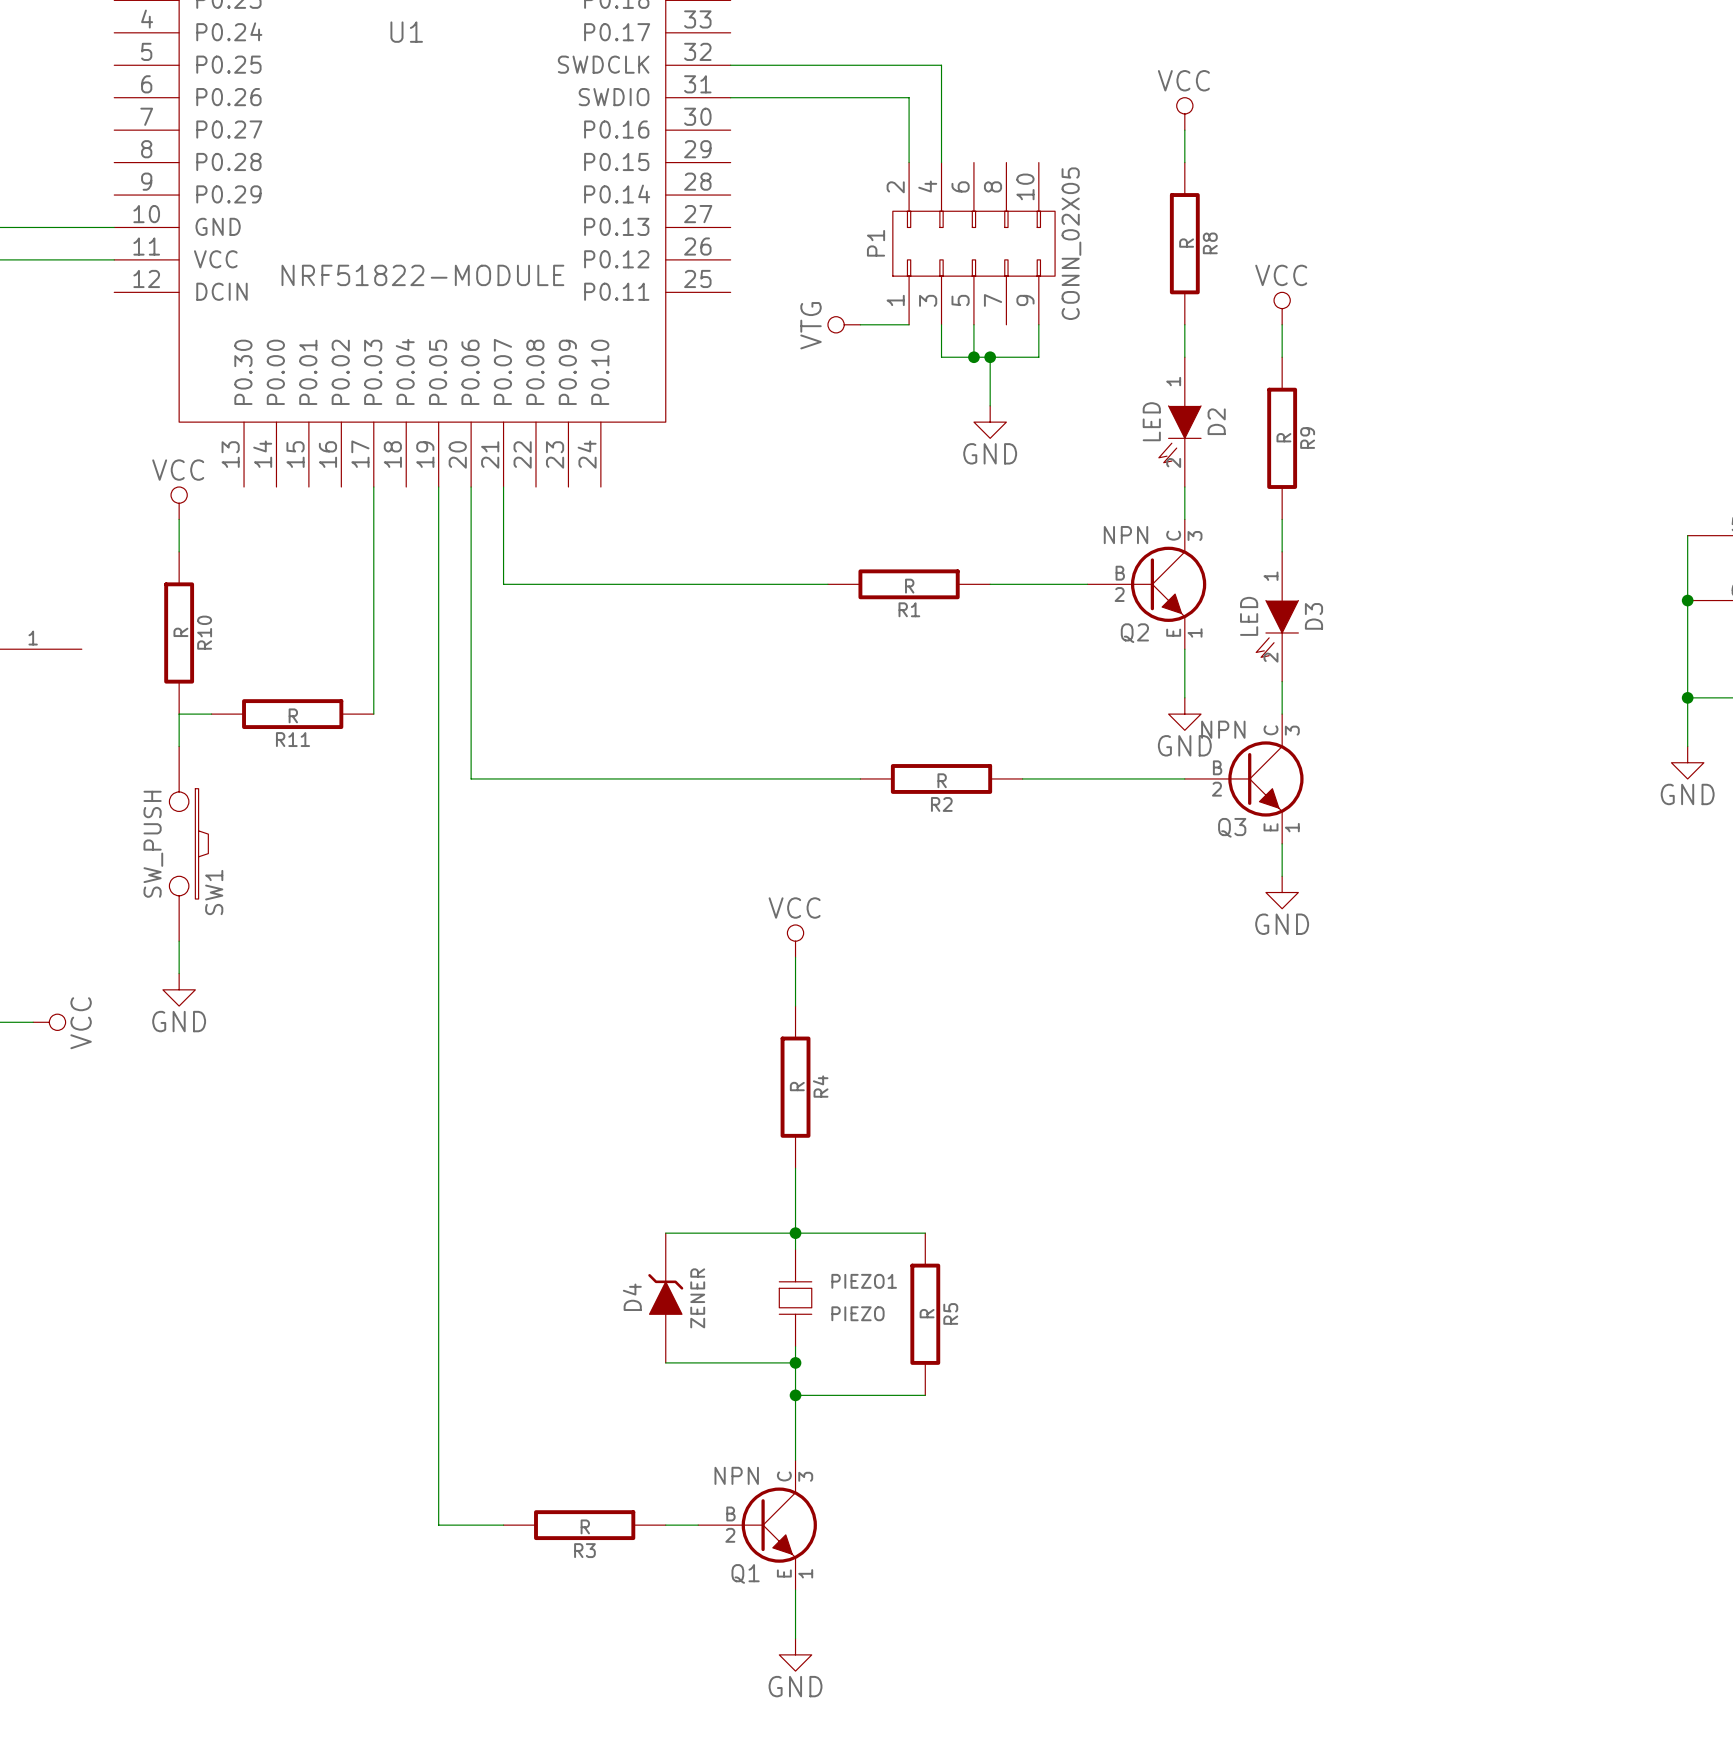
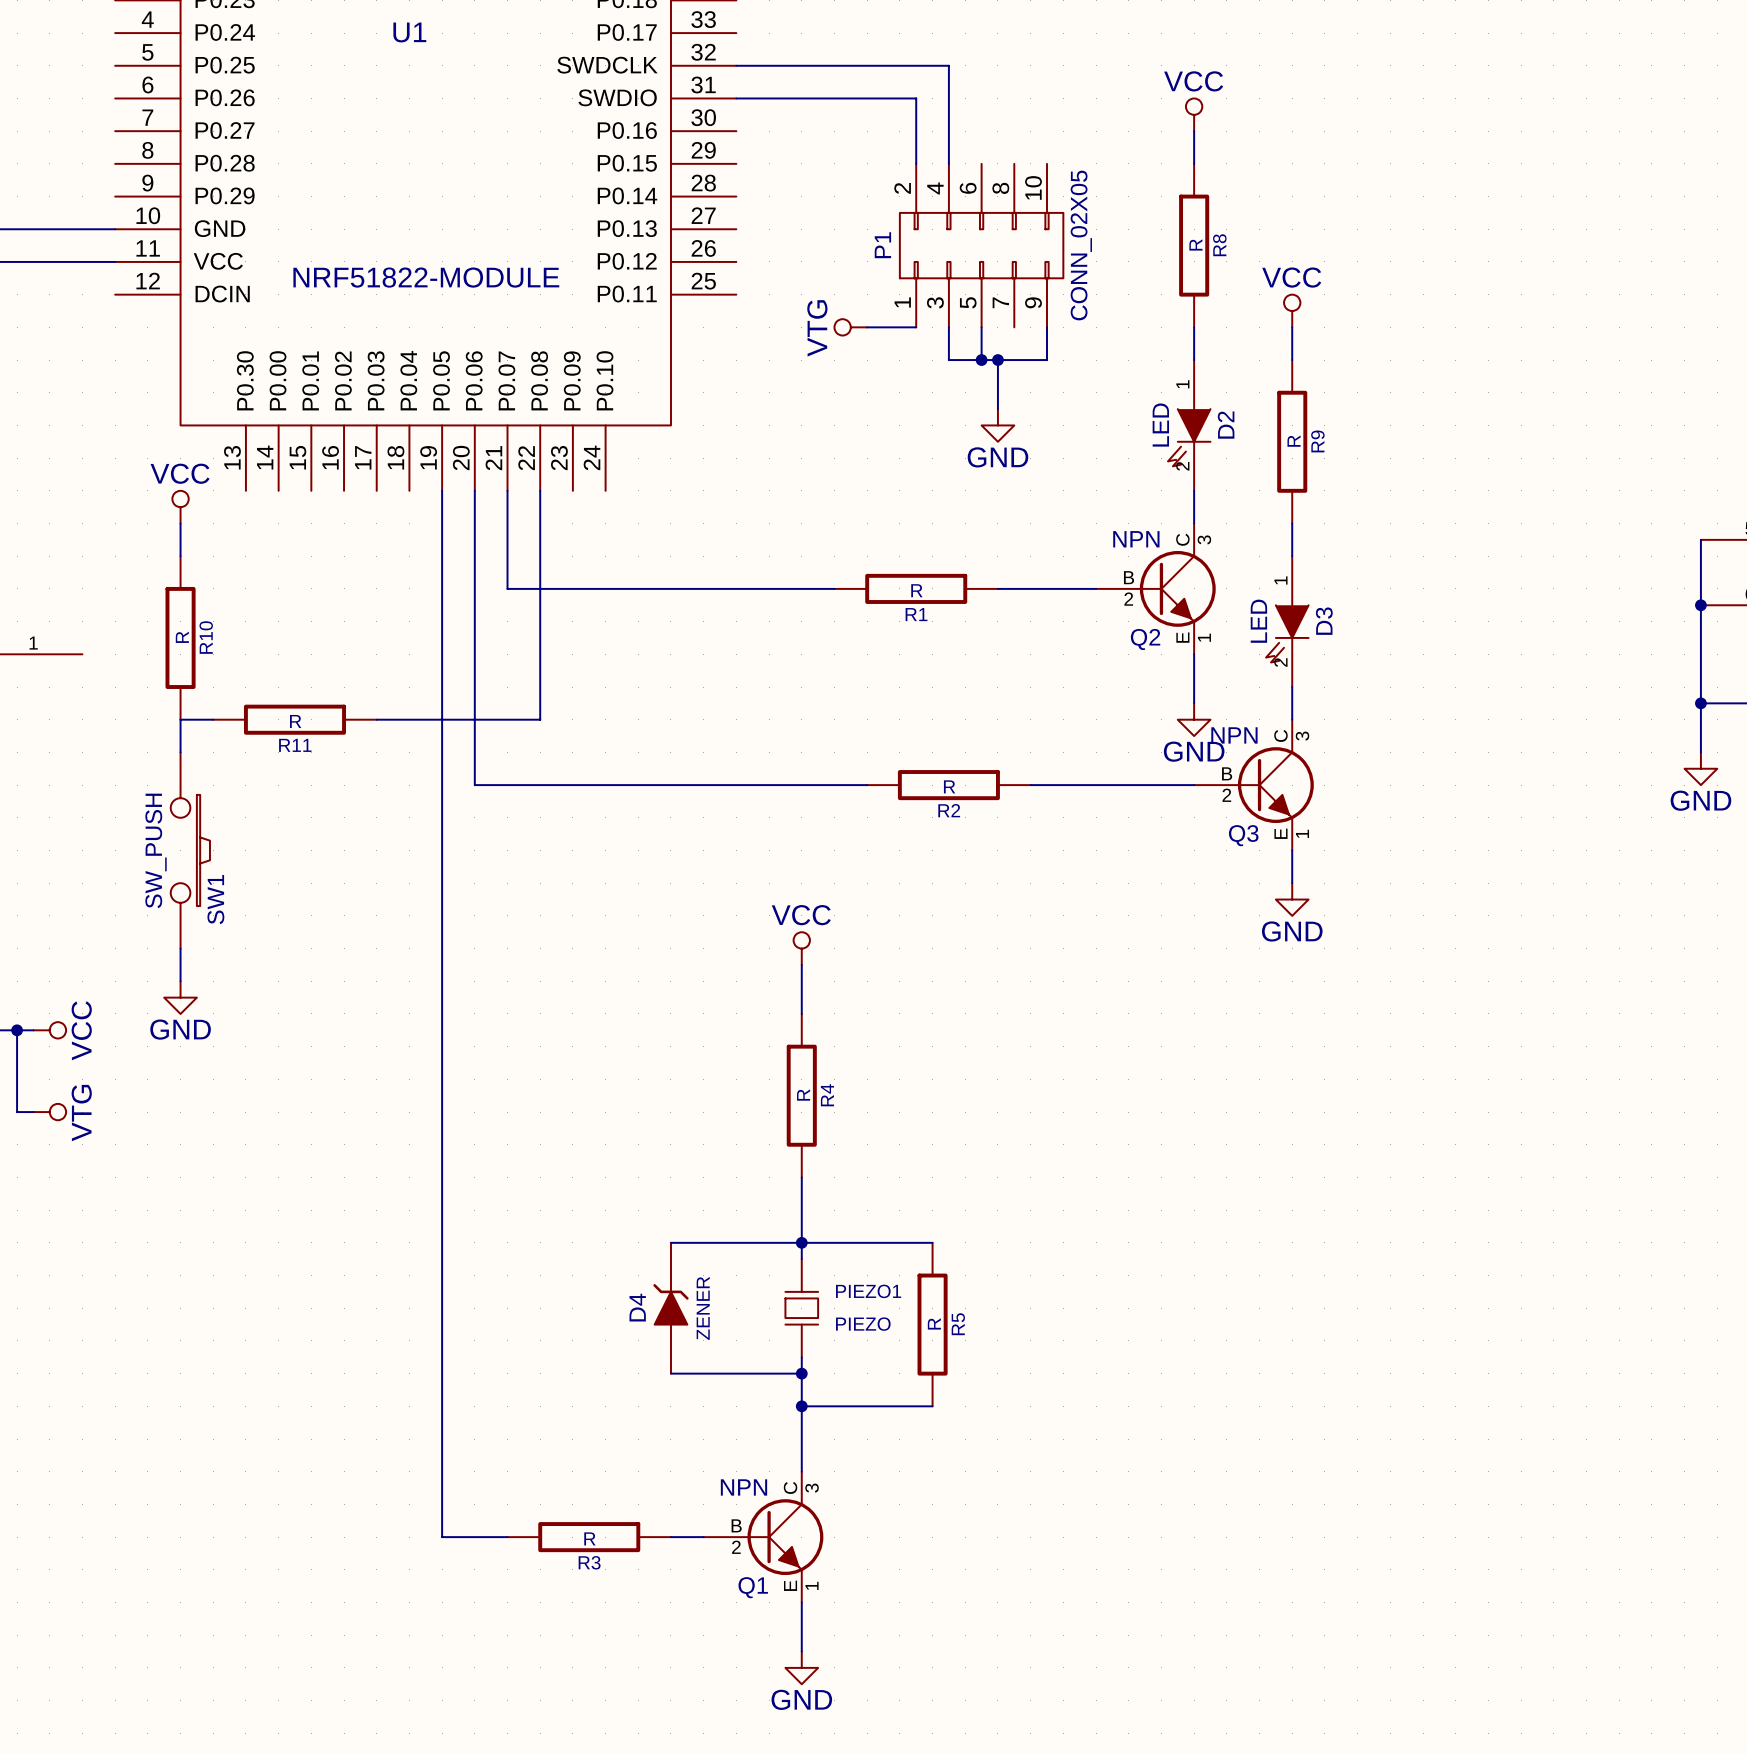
wire: (373, 487) (373, 714) -> (540, 490) (540, 719) (376, 719)
wire: none -> (17, 1030) (17, 1112) (33, 1112)
junction: none -> (17, 1030)
power symbol: none -> VTG (49, 1112)

